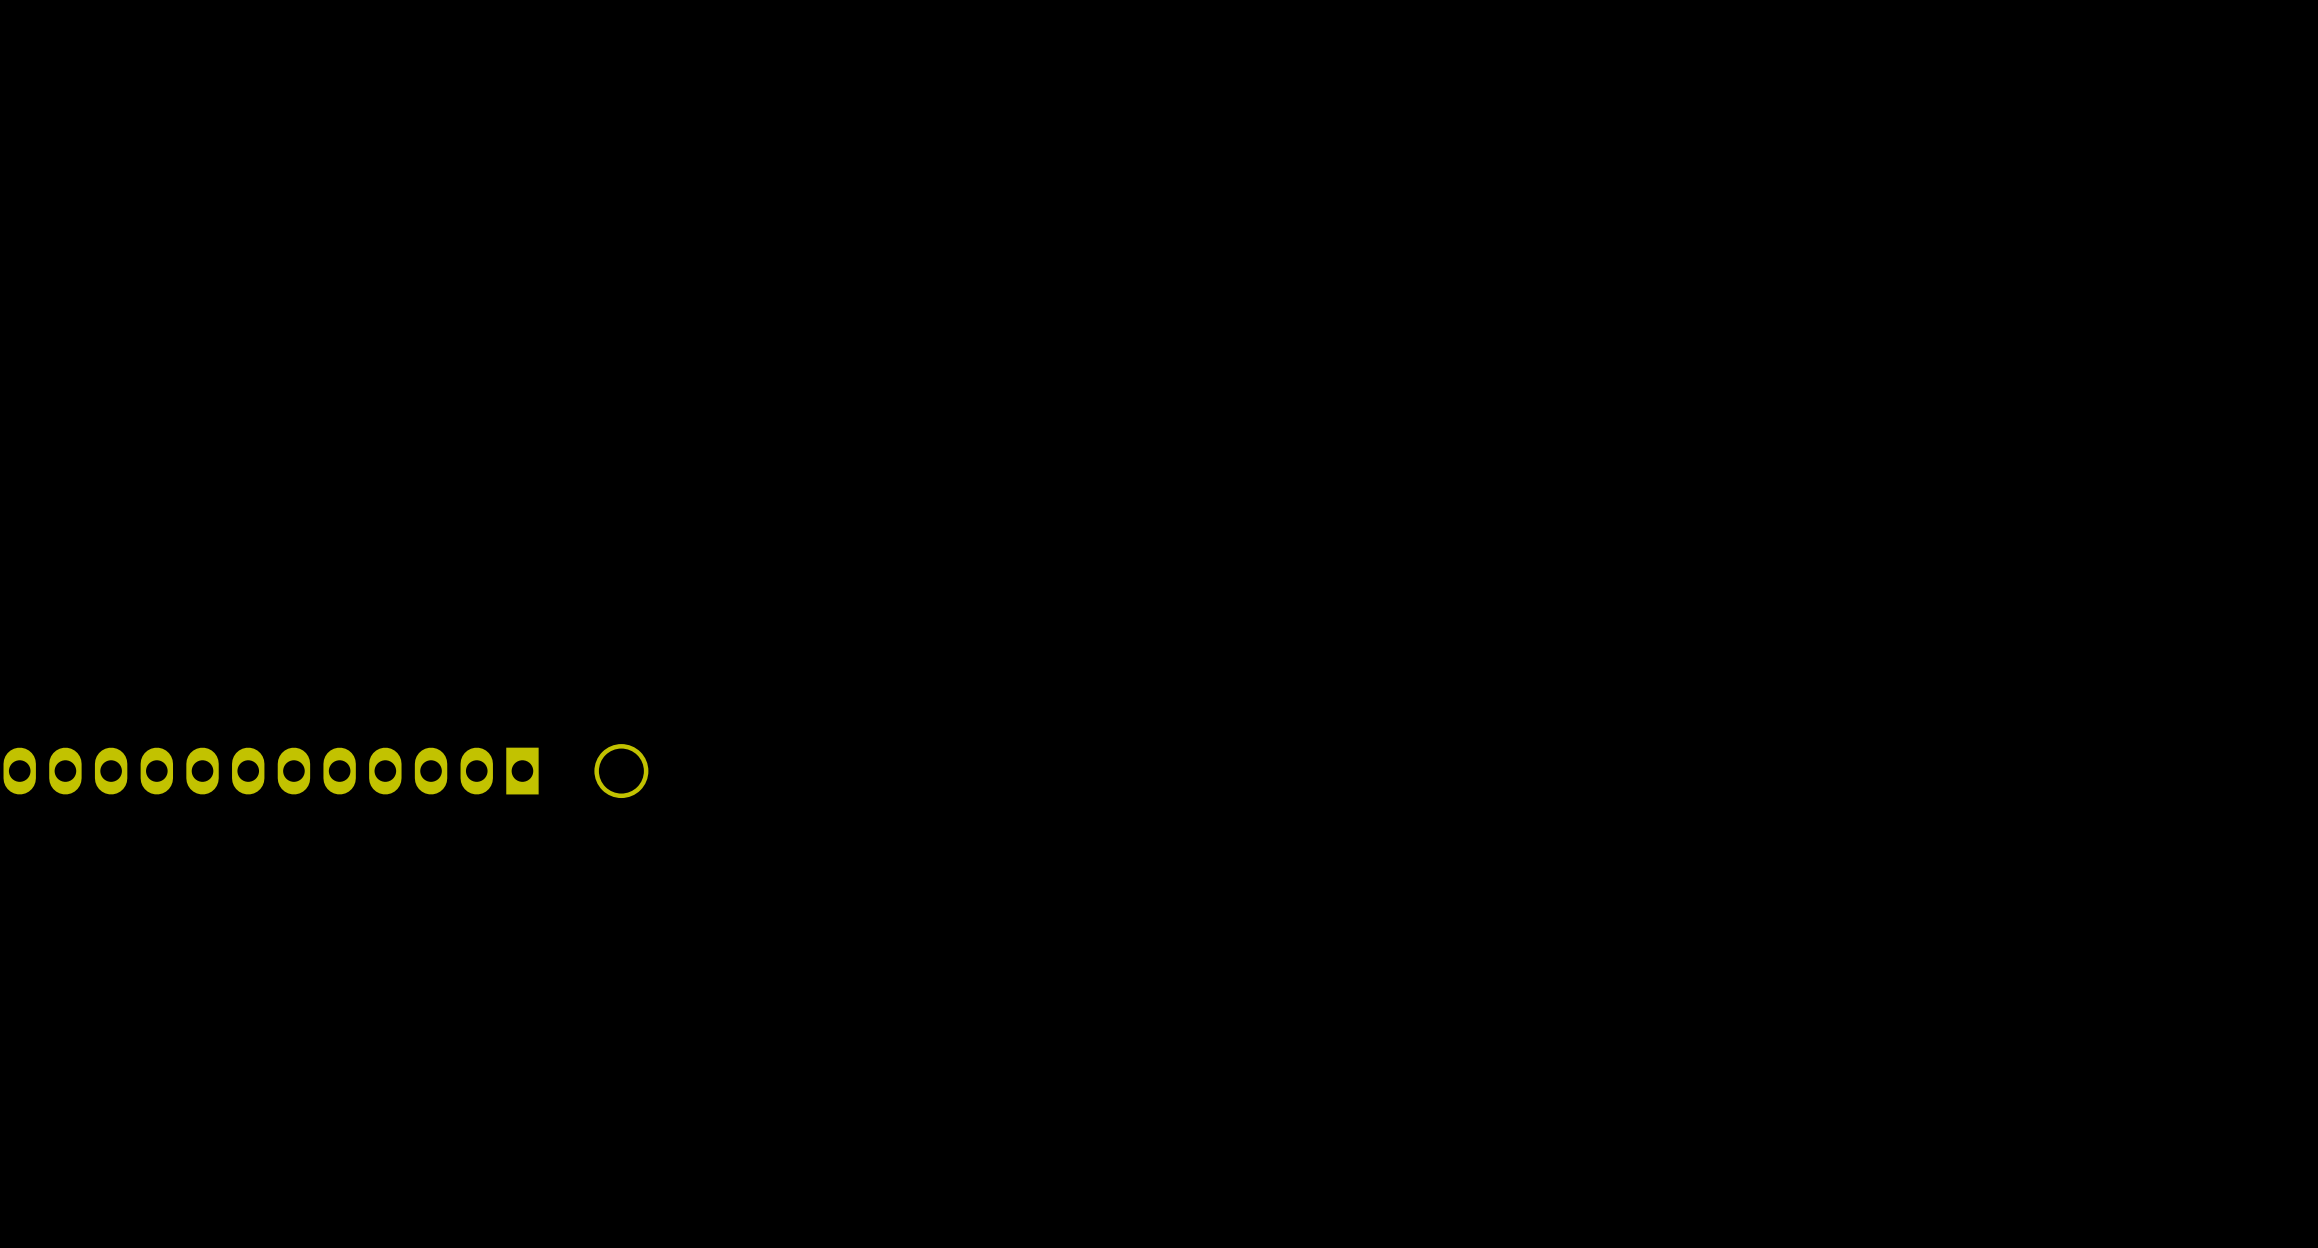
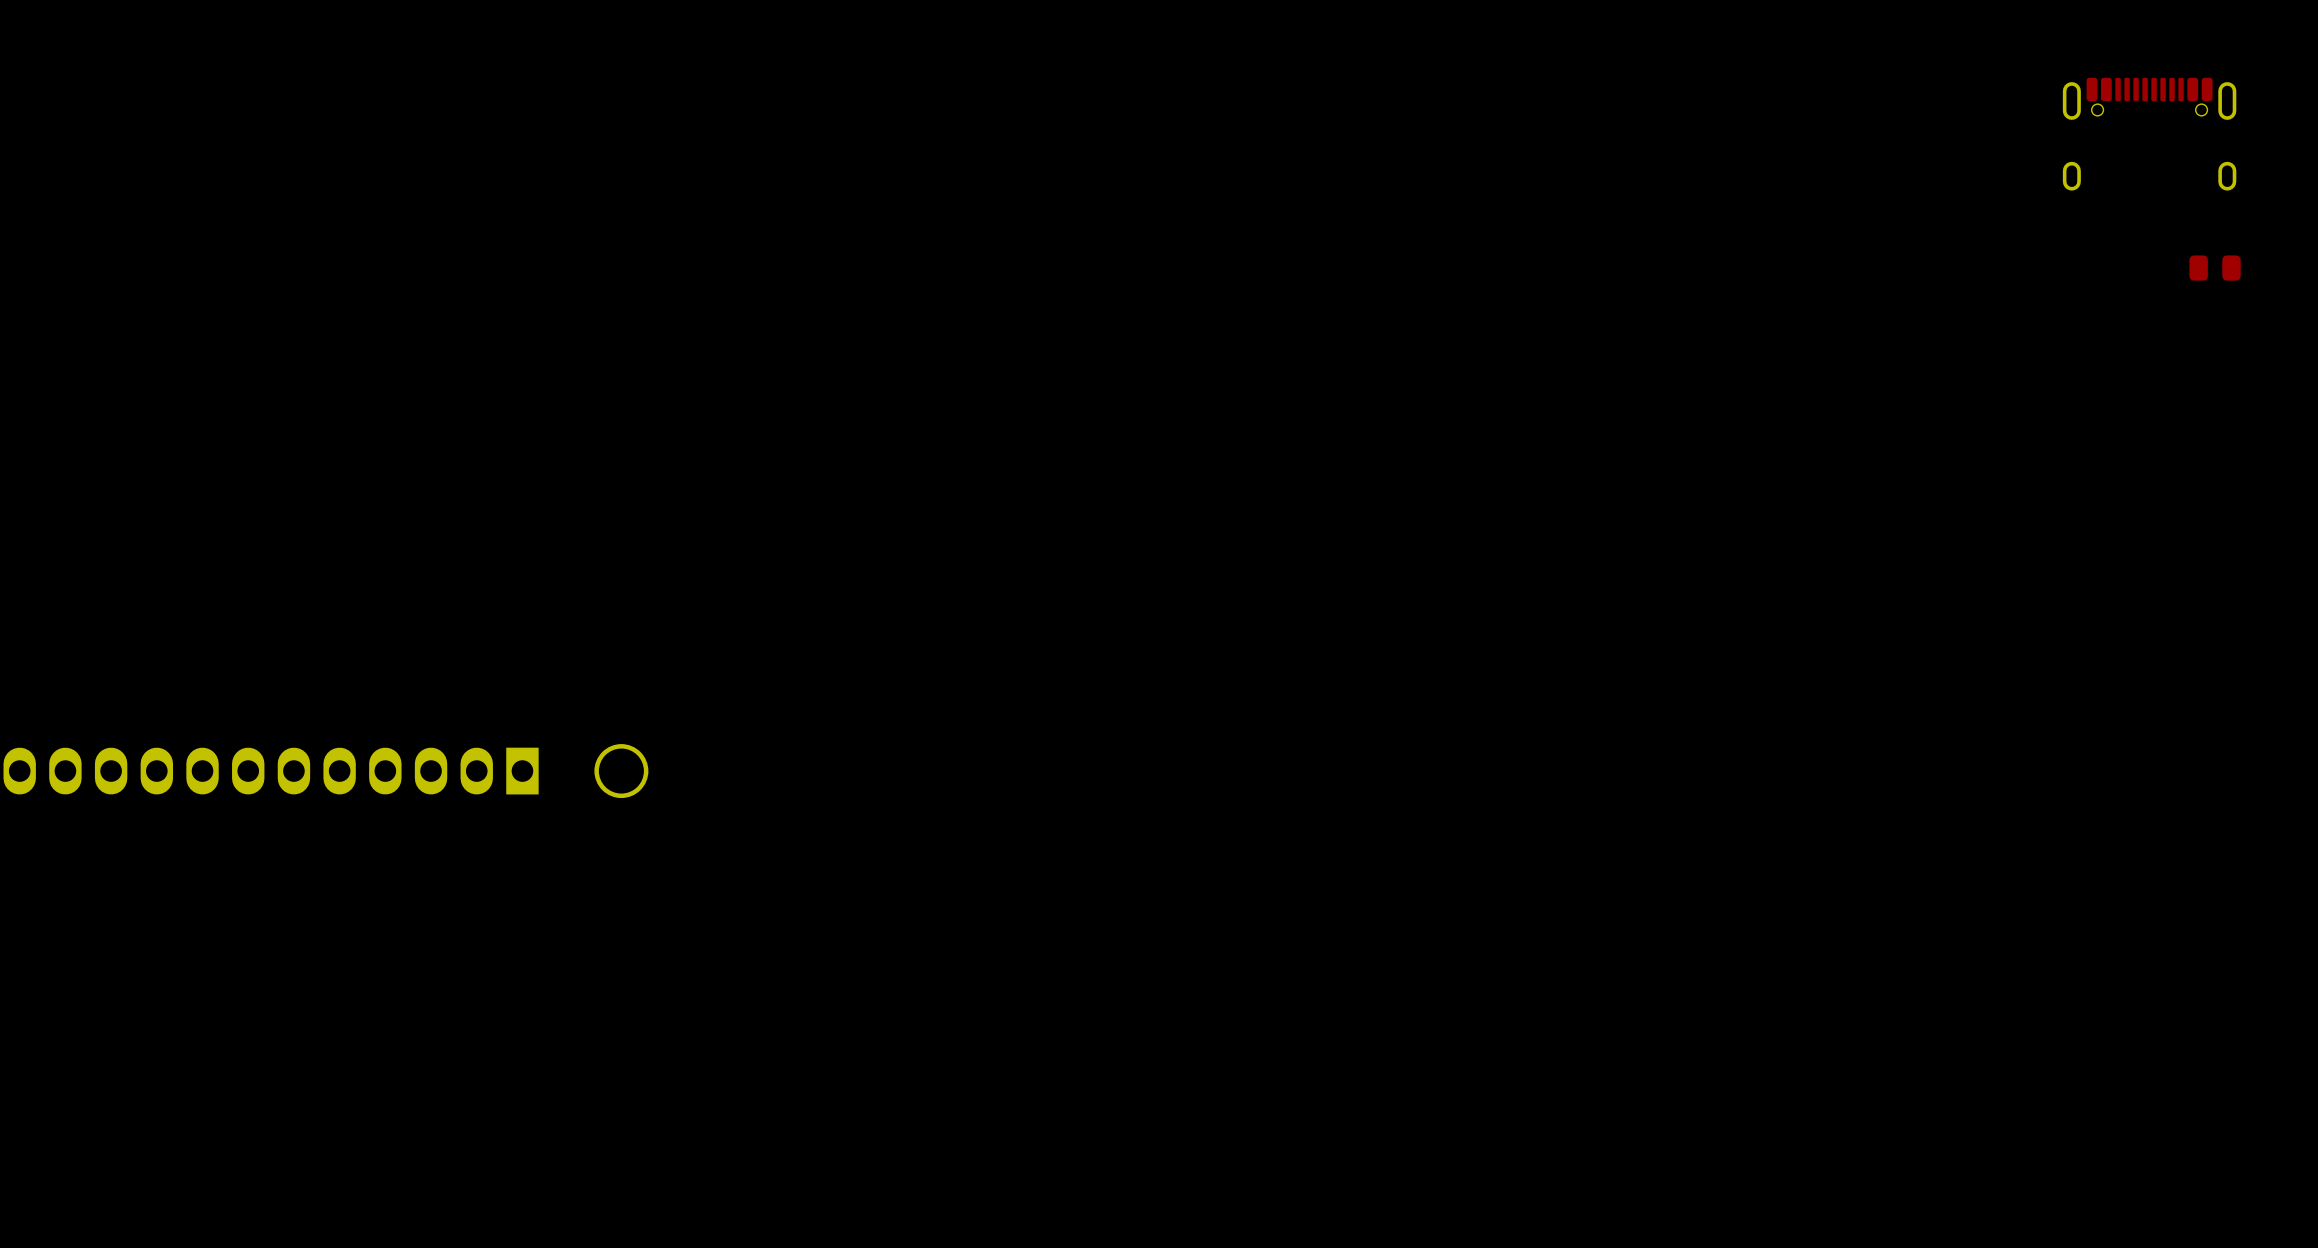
part: none -> (2149, 134)
part: none -> (2215, 268)

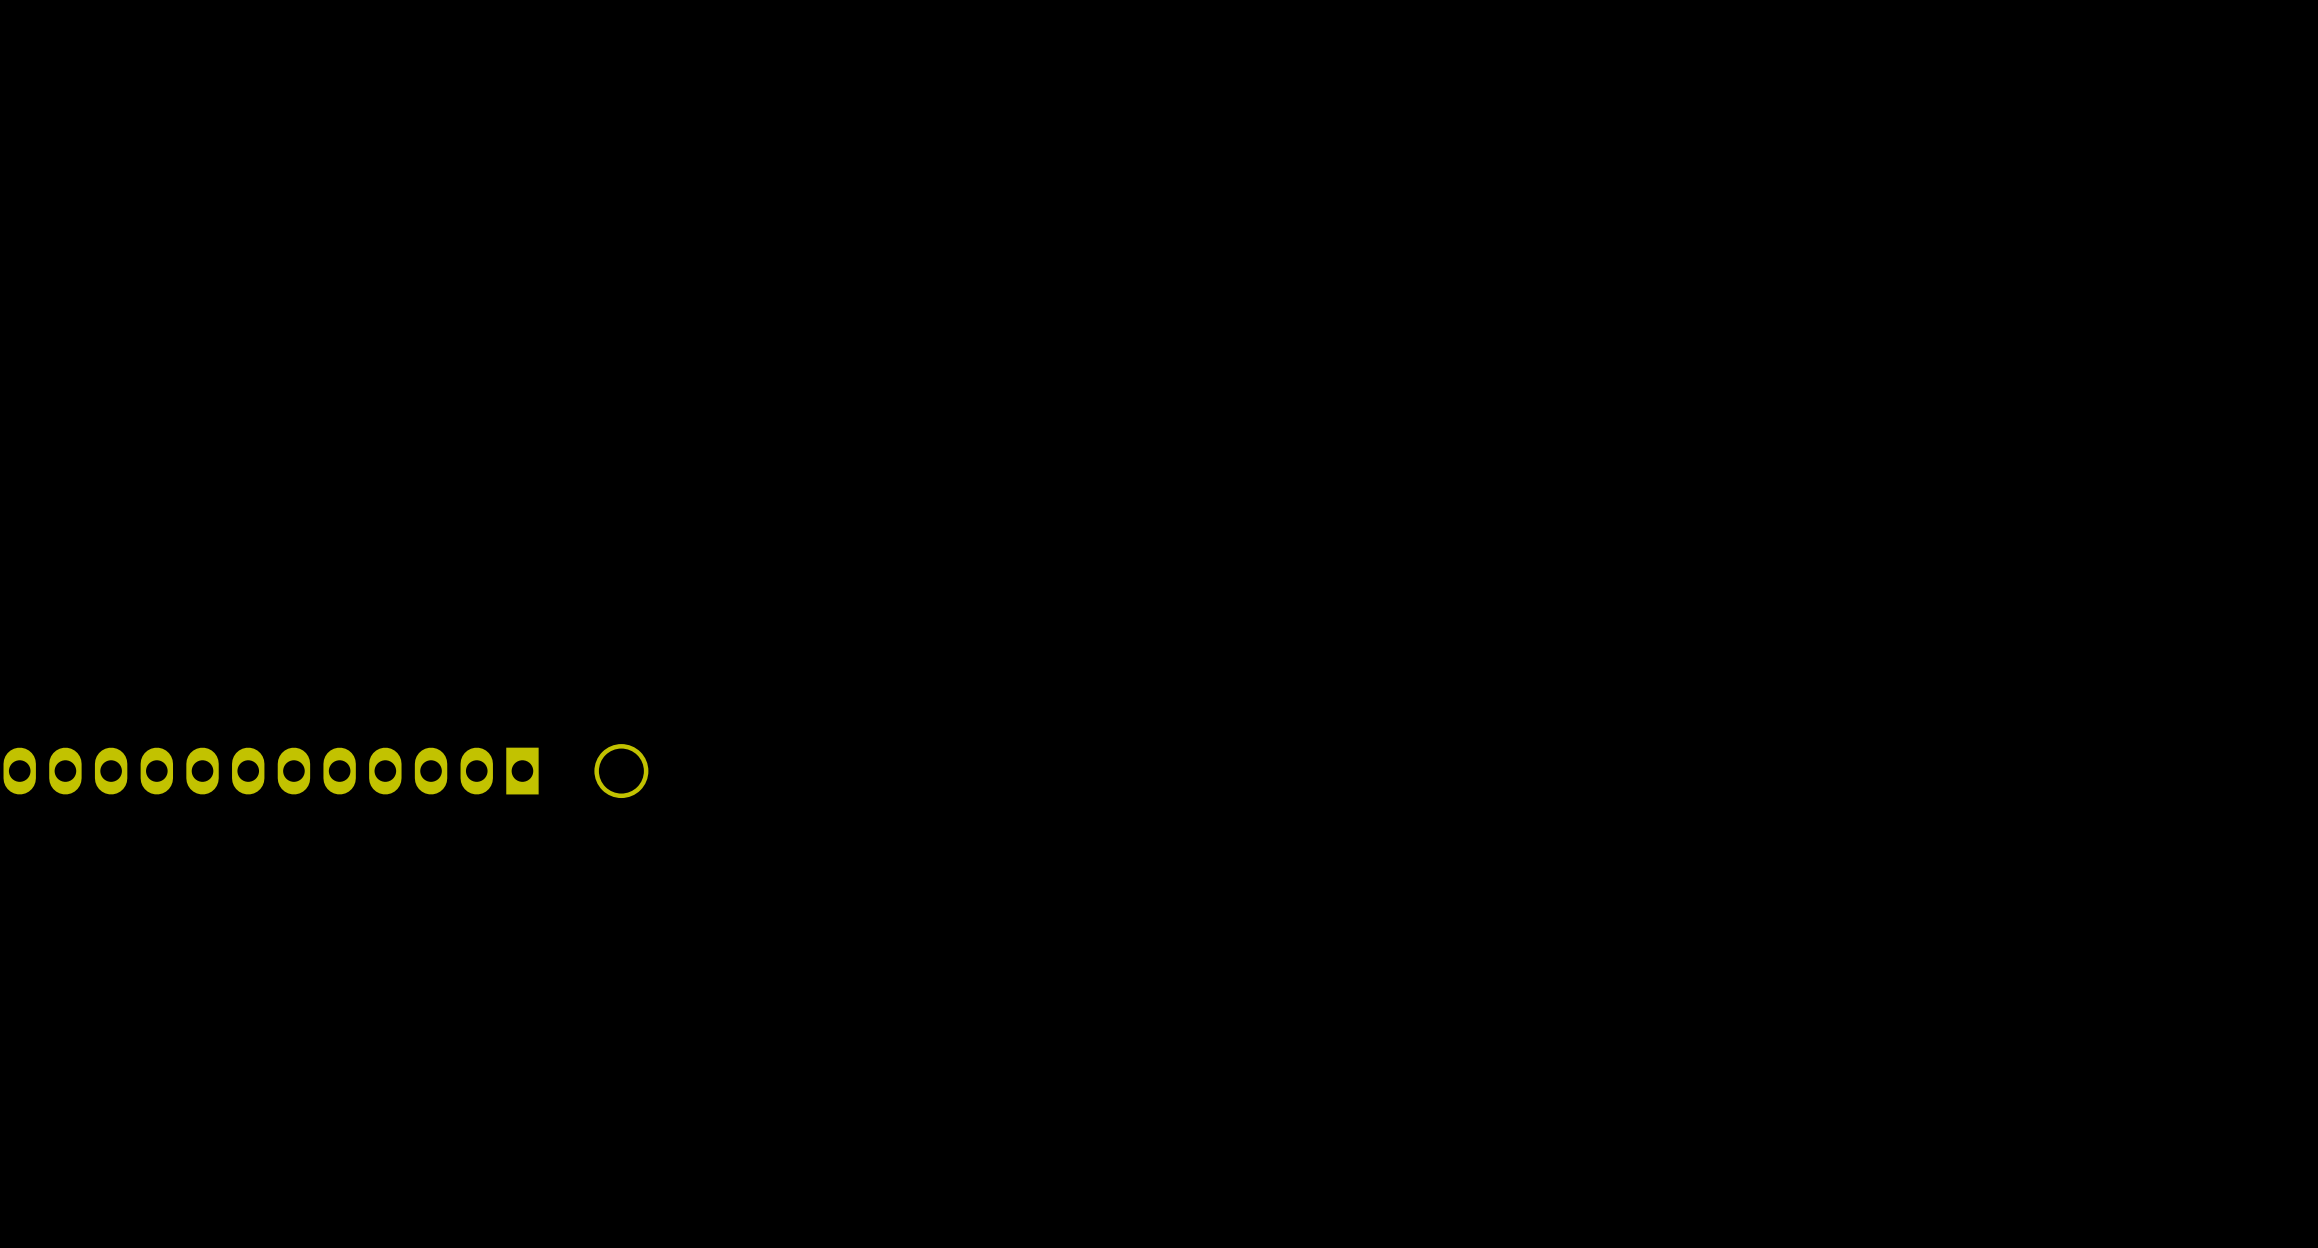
part: (2149, 134) -> none
part: (2215, 268) -> none

